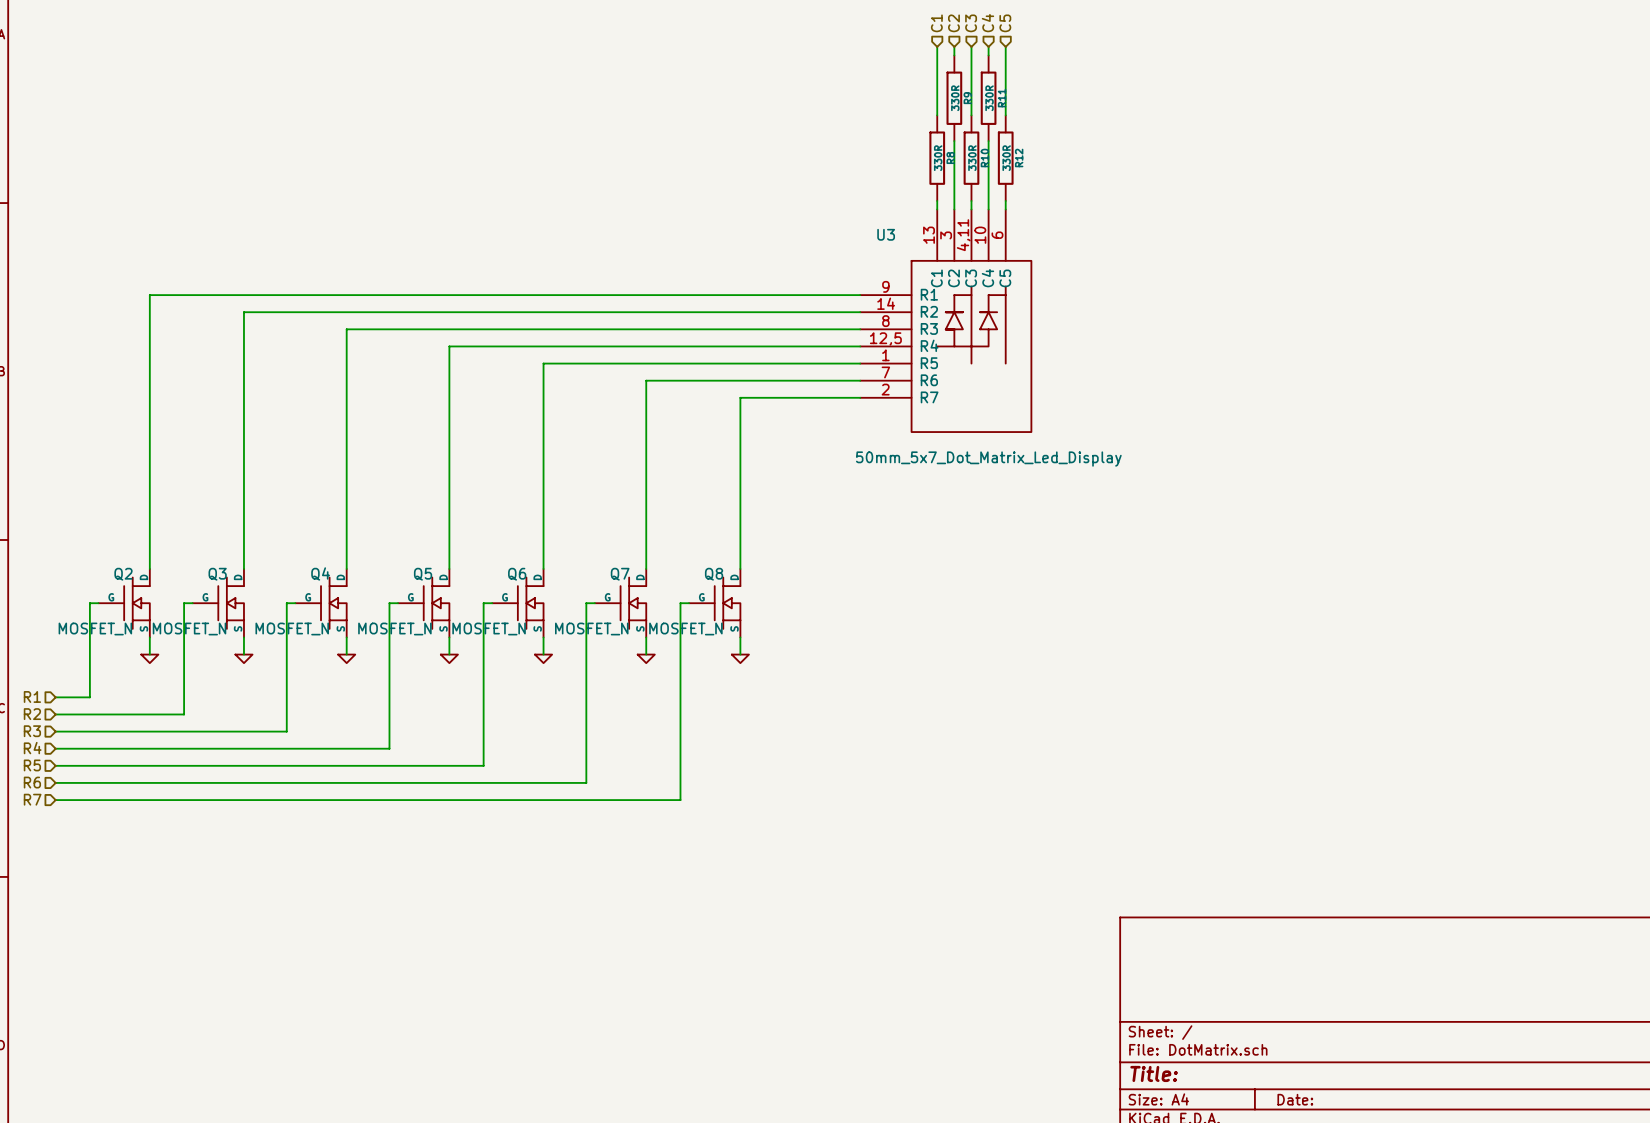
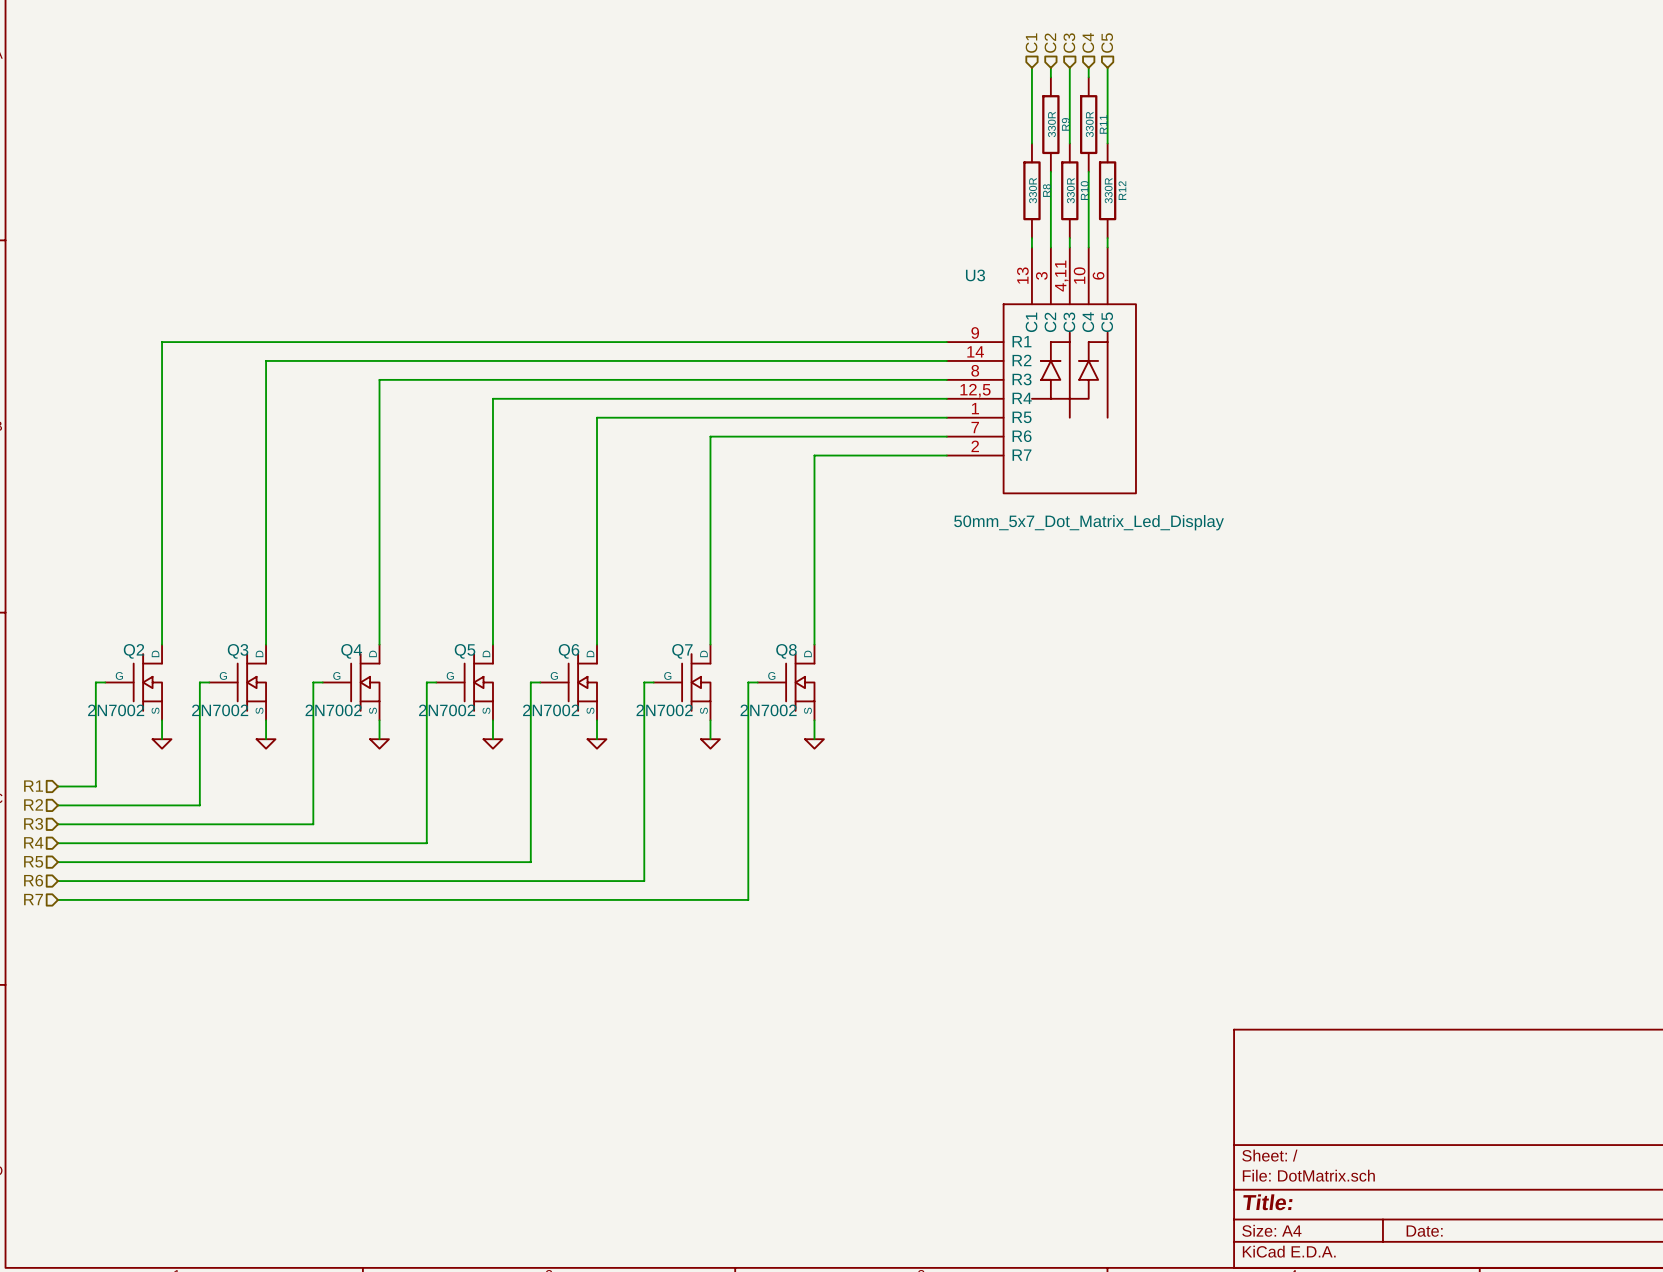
Q2 value: MOSFET_N (95, 628) -> 2N7002 (116, 710)
Q3 value: MOSFET_N (189, 628) -> 2N7002 (220, 710)
Q4 value: MOSFET_N (292, 628) -> 2N7002 (333, 710)
Q5 value: MOSFET_N (394, 628) -> 2N7002 (447, 710)
Q6 value: MOSFET_N (489, 628) -> 2N7002 (551, 710)
Q7 value: MOSFET_N (591, 628) -> 2N7002 (664, 710)
Q8 value: MOSFET_N (685, 628) -> 2N7002 (768, 710)

